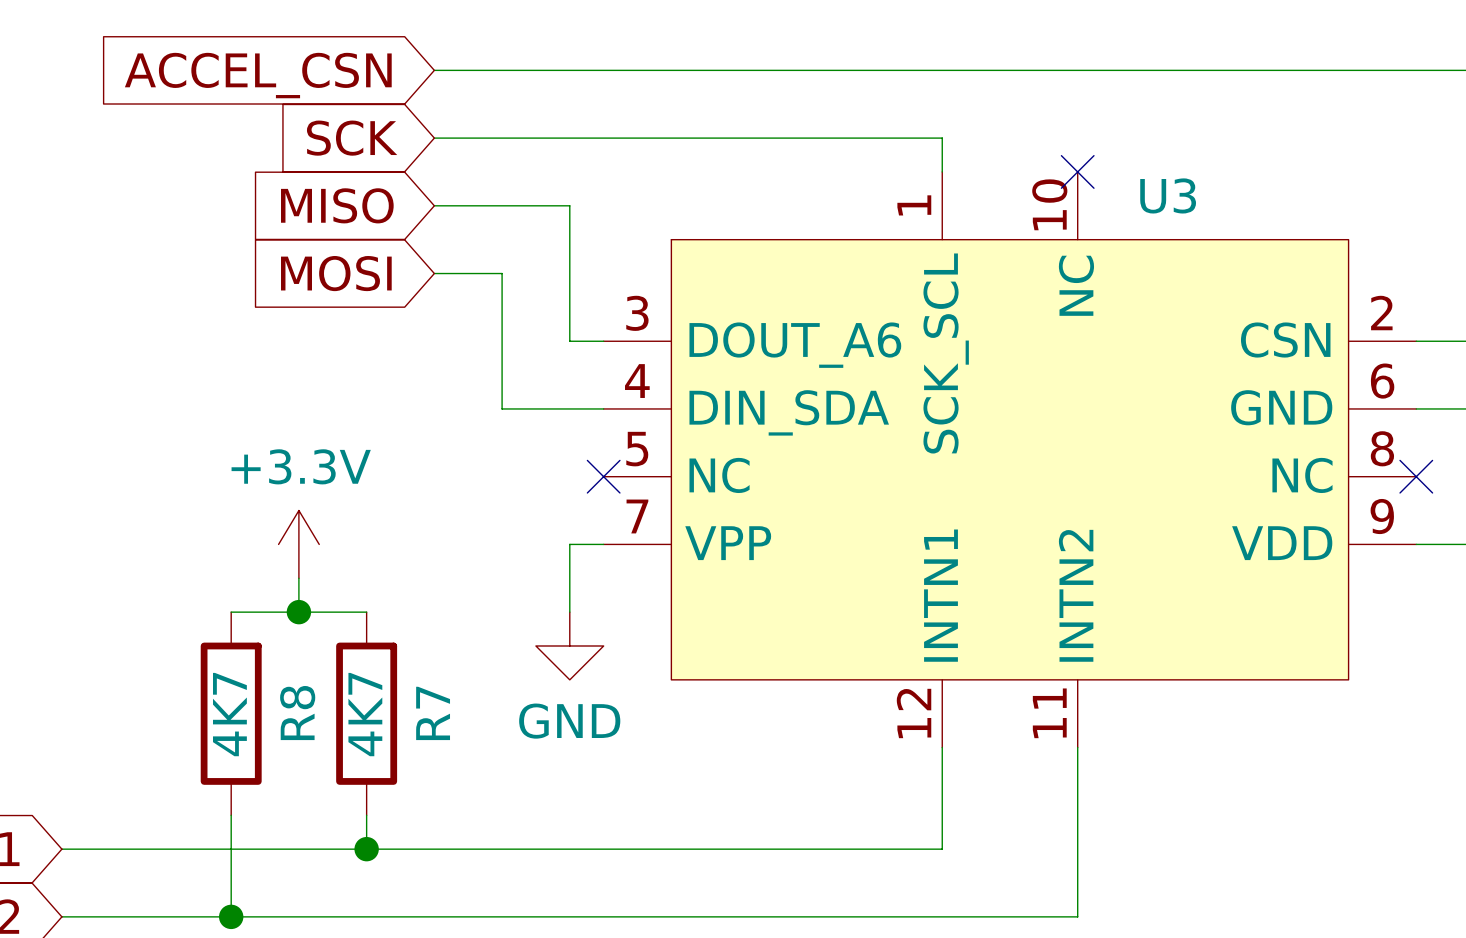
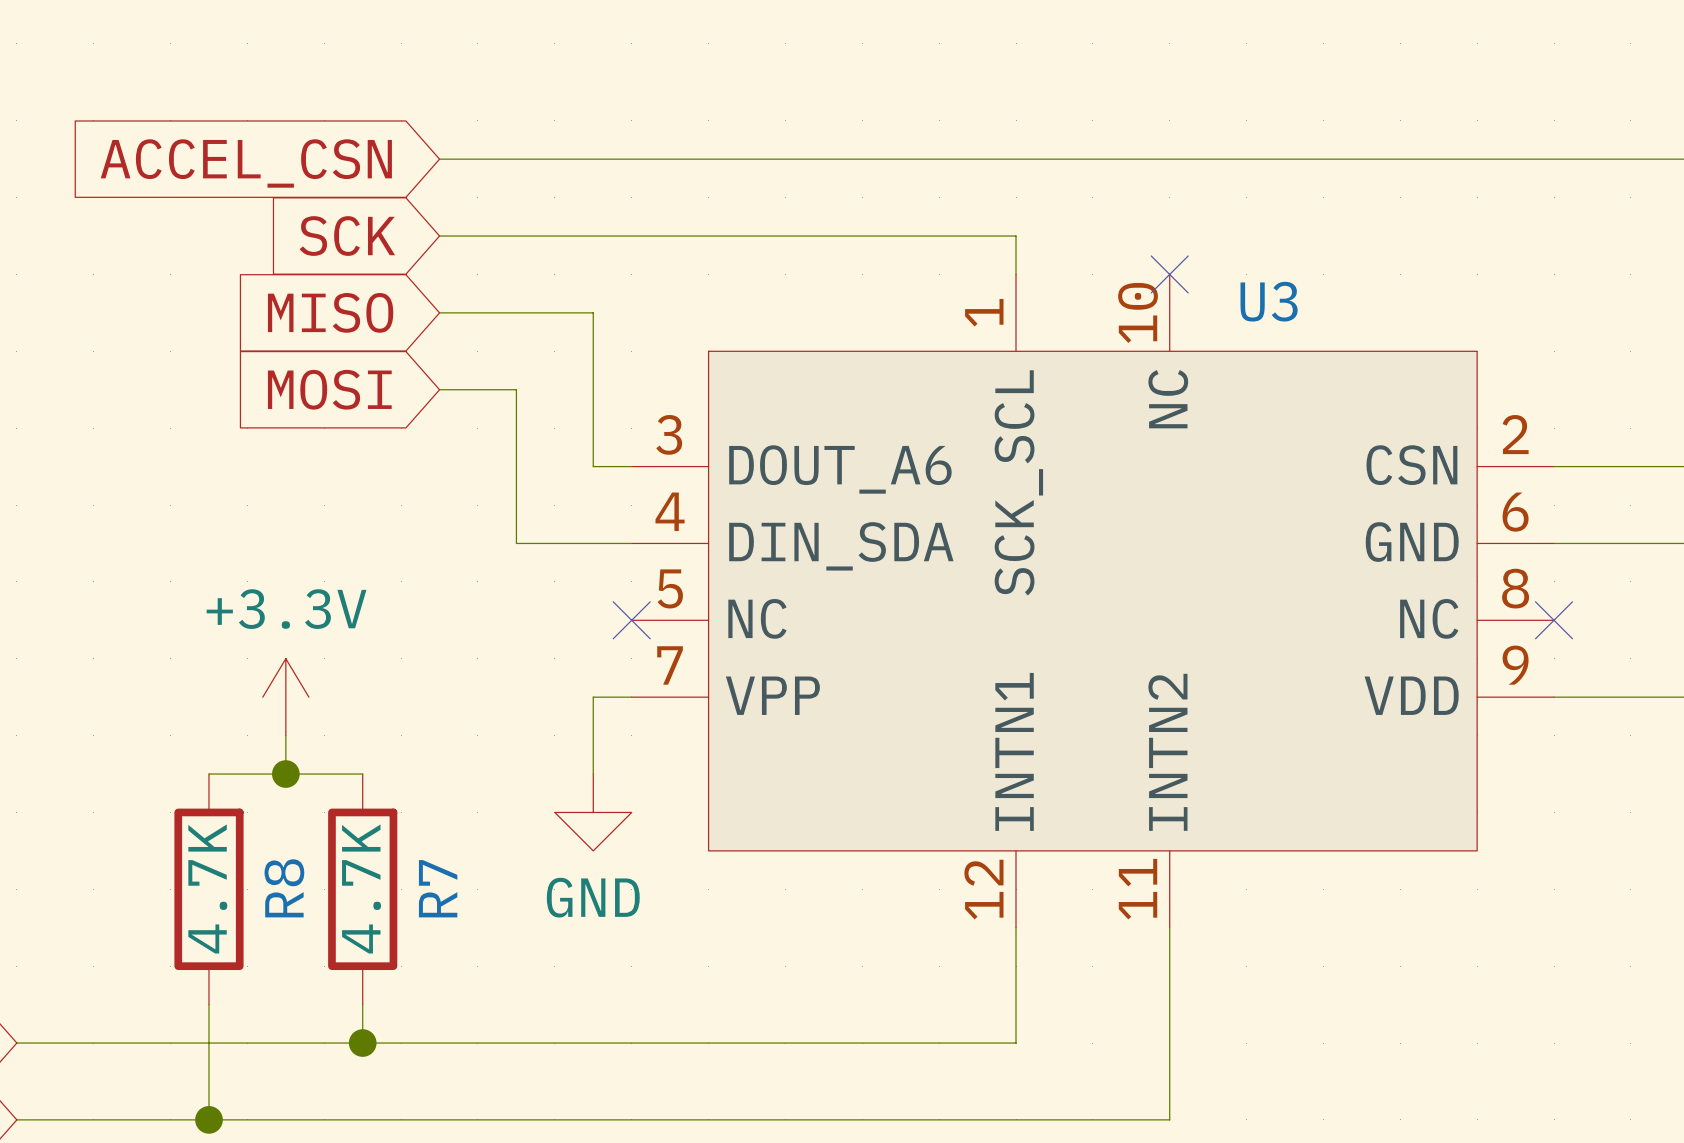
R8 value: 4K7 (229, 714) -> 4.7K (207, 888)
R7 value: 4K7 (365, 714) -> 4.7K (361, 888)

